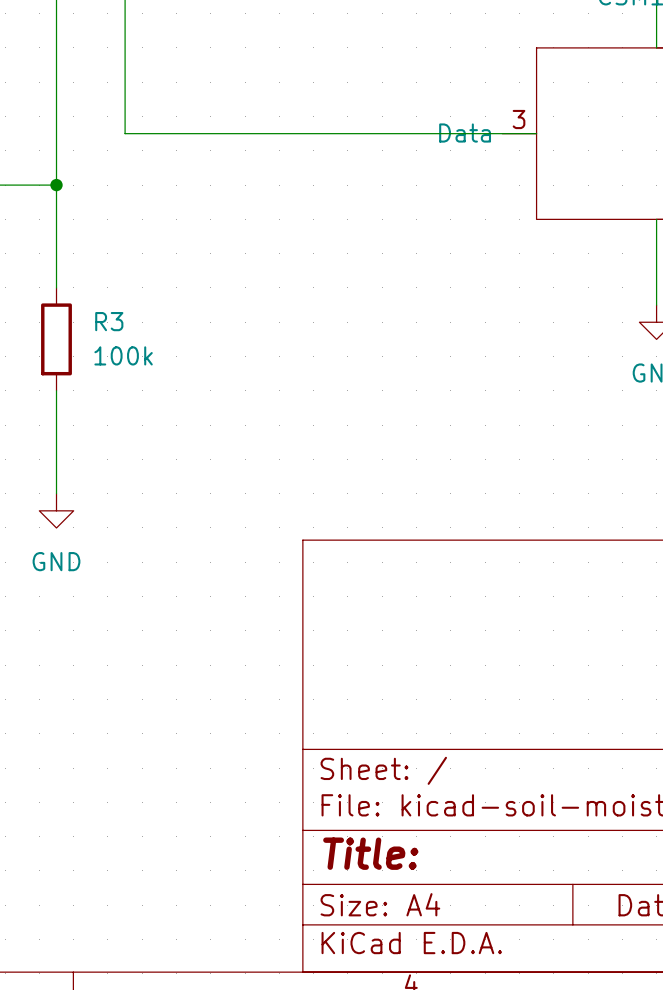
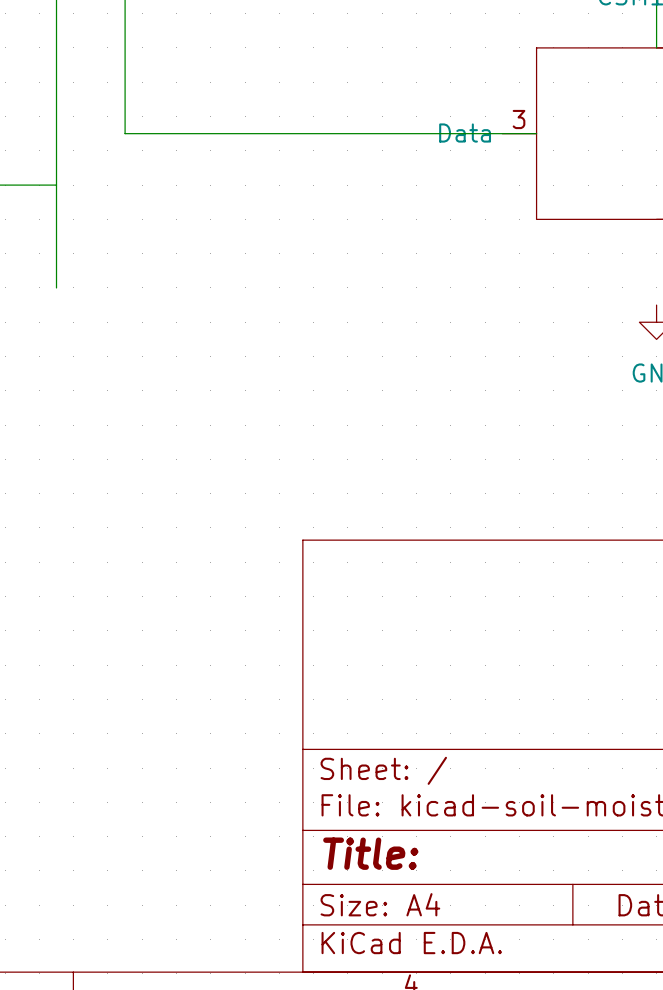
junction: (56, 185) -> none
wire: (656, 219) (656, 305) -> none
R3: 100k (56, 339) -> none
wire: (56, 390) (56, 493) -> none
power symbol: GND (56, 510) -> none

